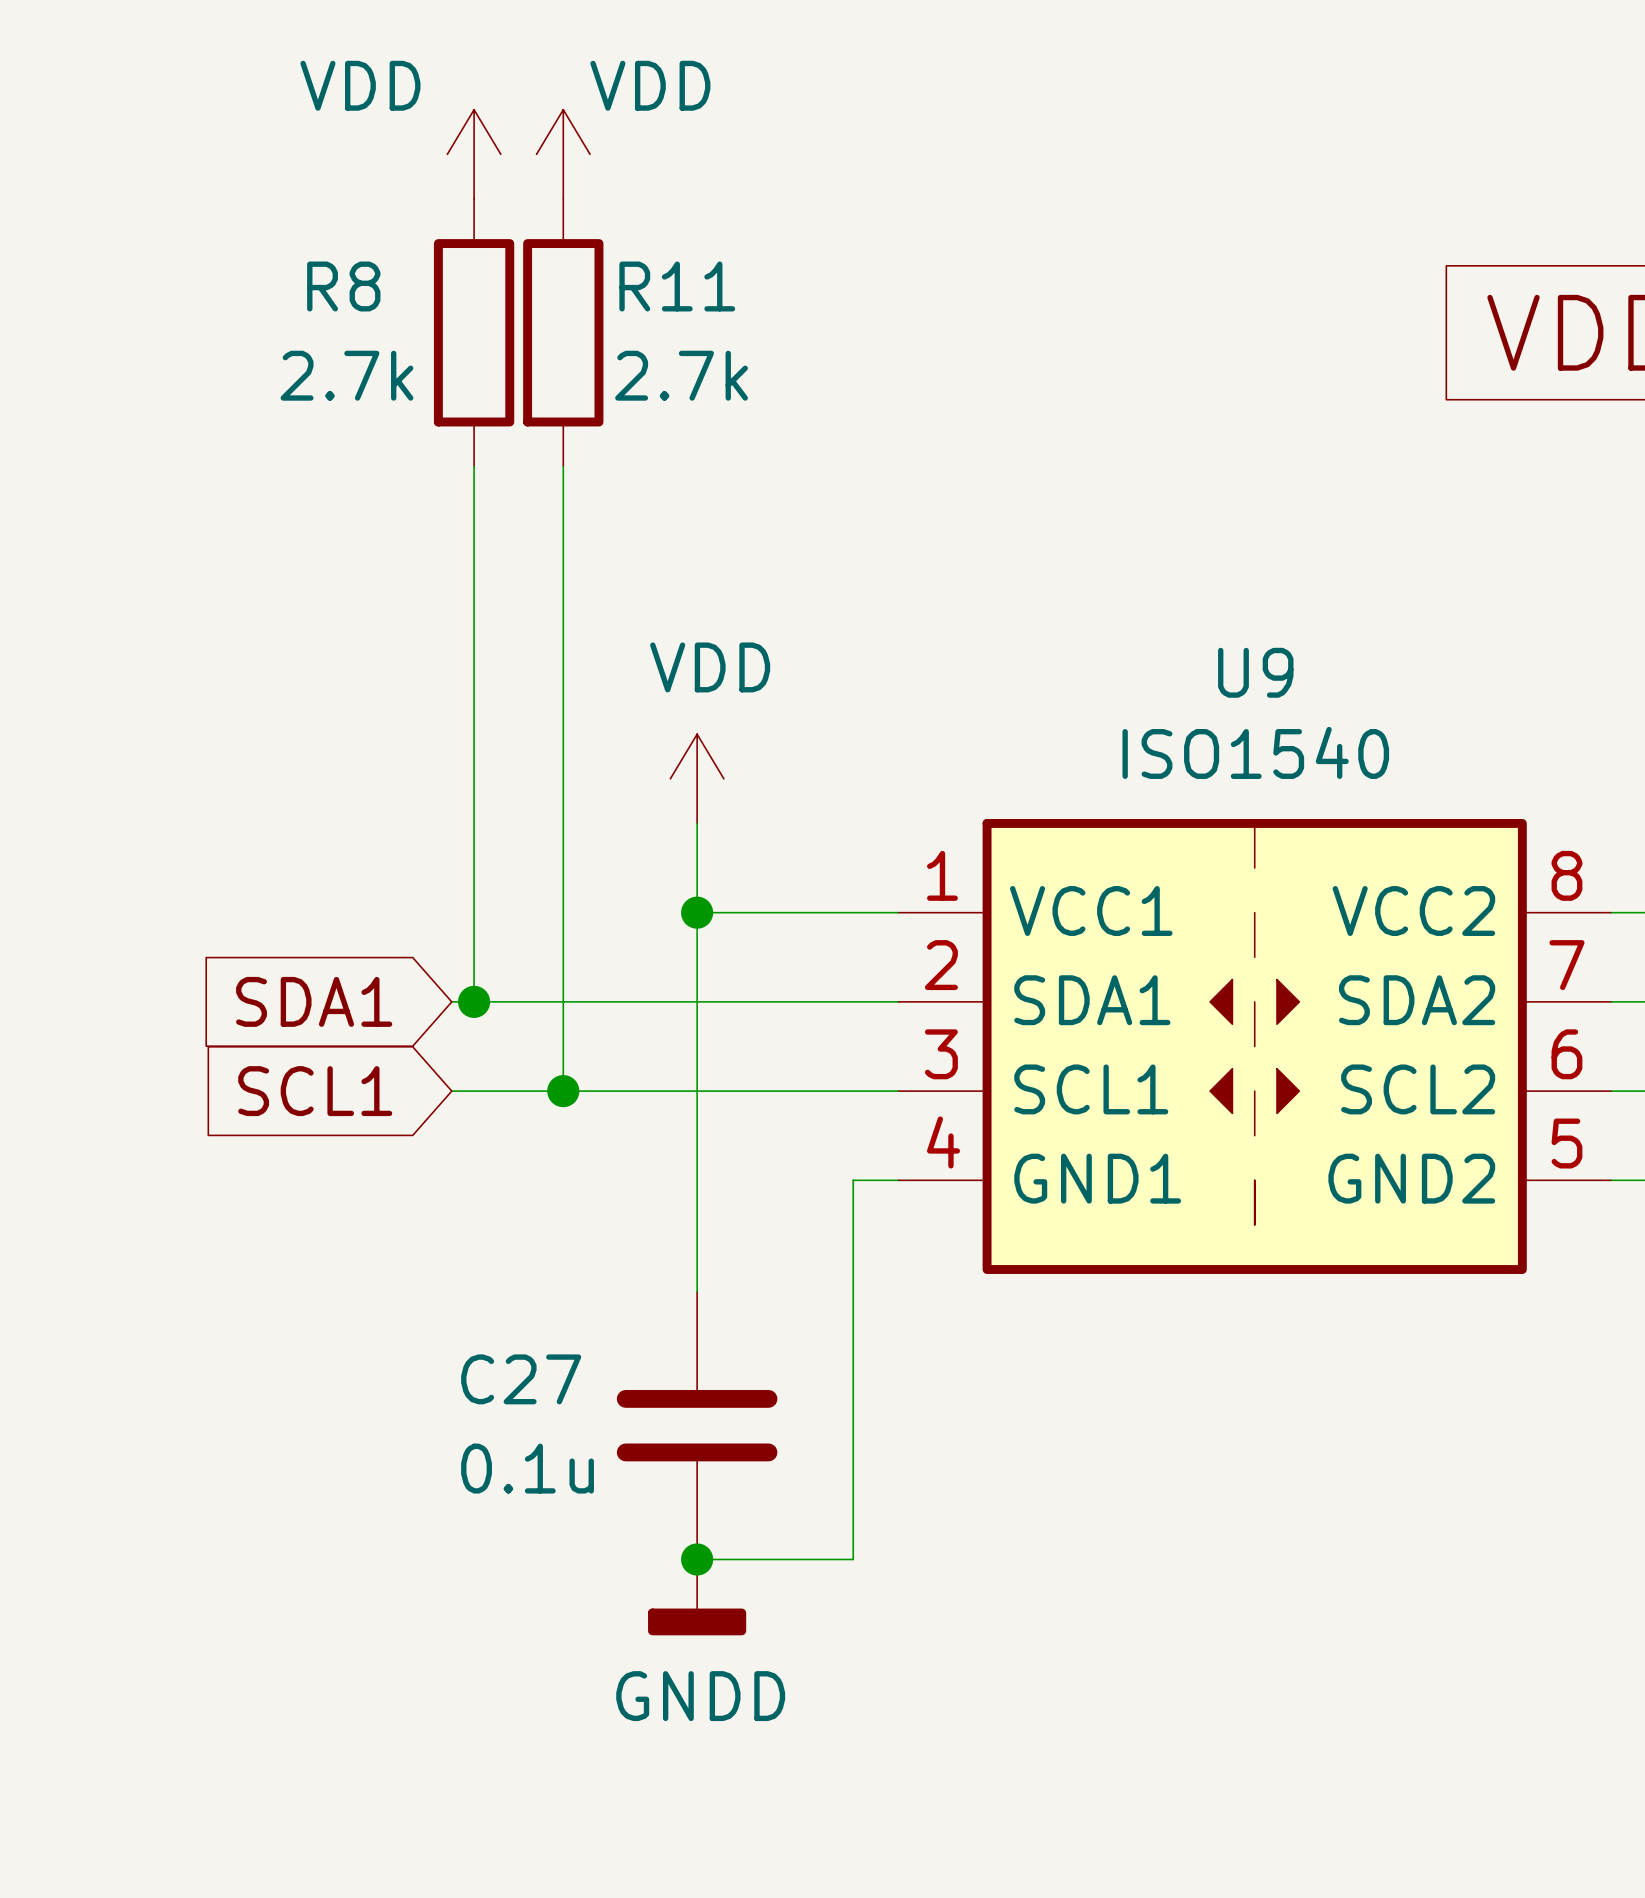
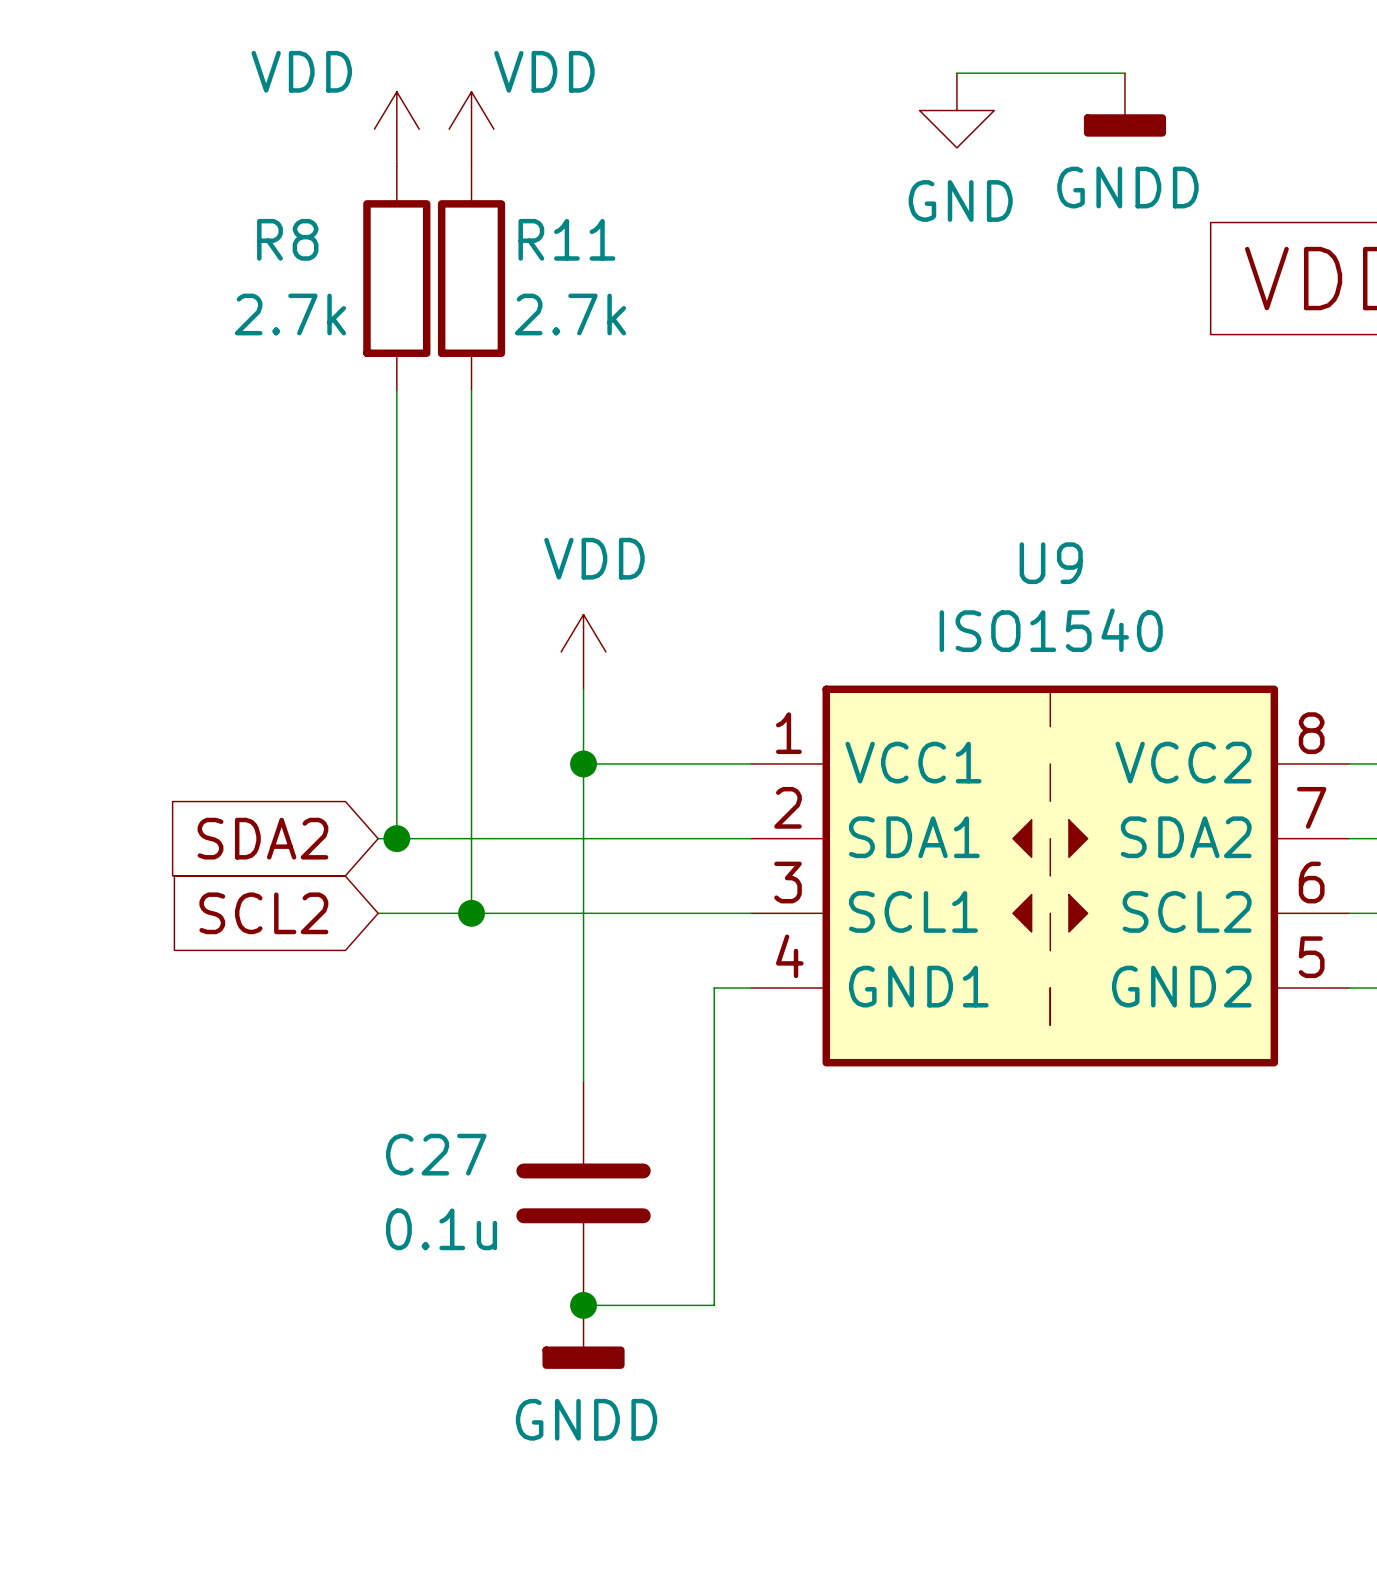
wire: none -> (956, 73) (1124, 73)
power symbol: none -> GNDD (1124, 104)
power symbol: none -> GND (956, 110)
global label: SDA1 (314, 1001) -> SDA2 (262, 838)
global label: SCL1 (315, 1091) -> SCL2 (263, 913)

